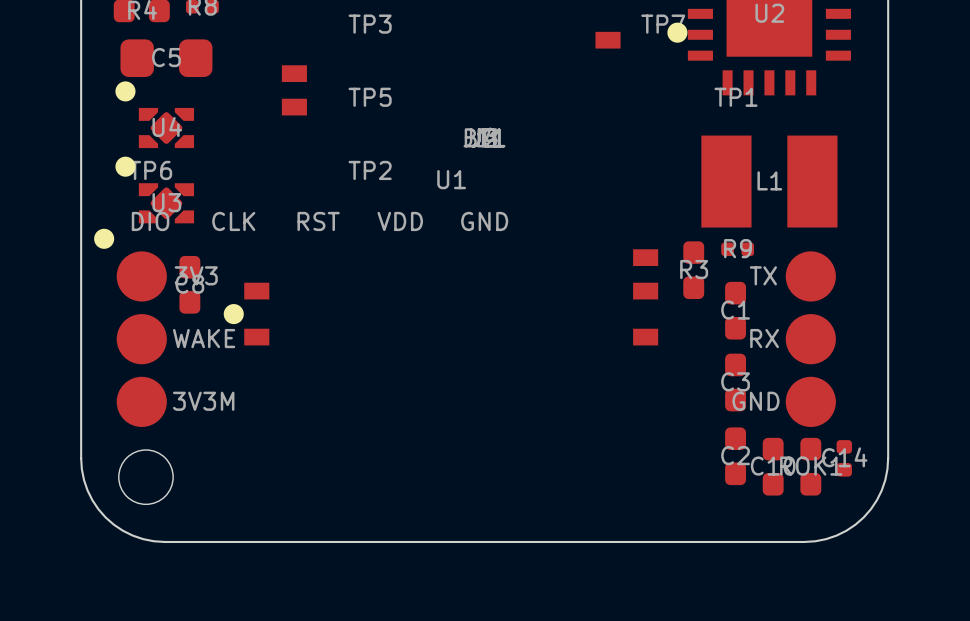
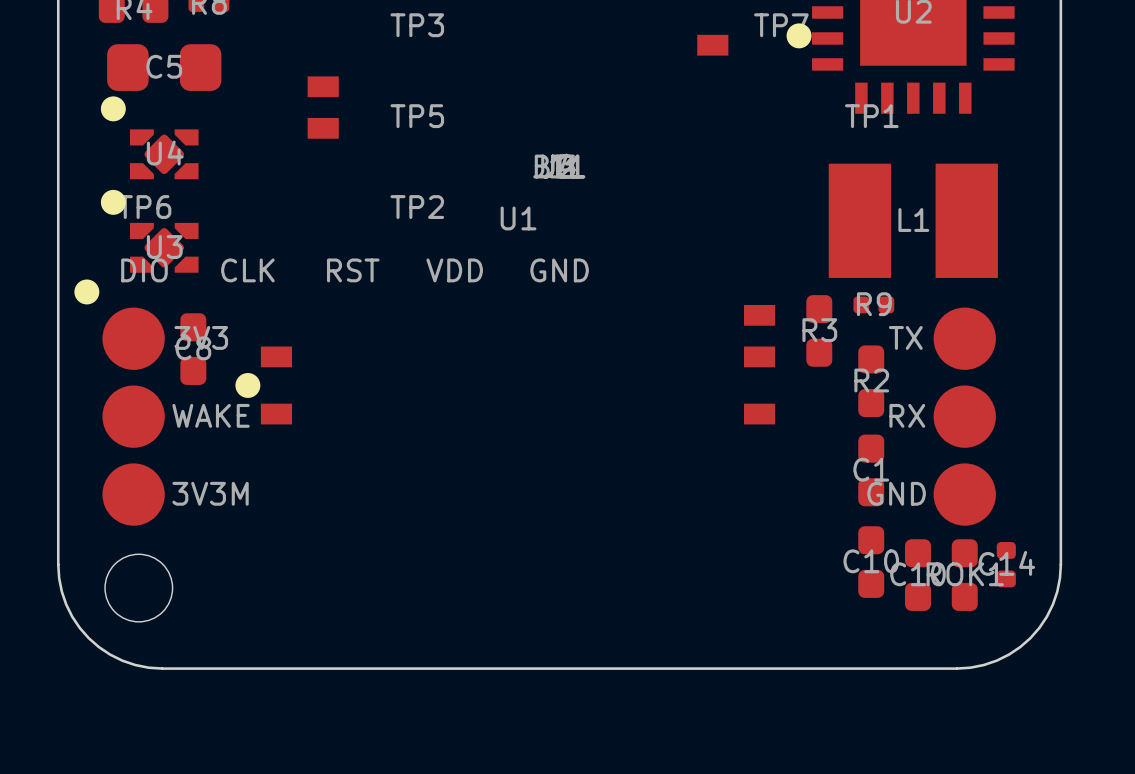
part text: C1 (735, 310) -> R2 (871, 380)
part text: C3 (735, 381) -> C1 (871, 469)
part text: C2 (735, 455) -> C10 (871, 561)

